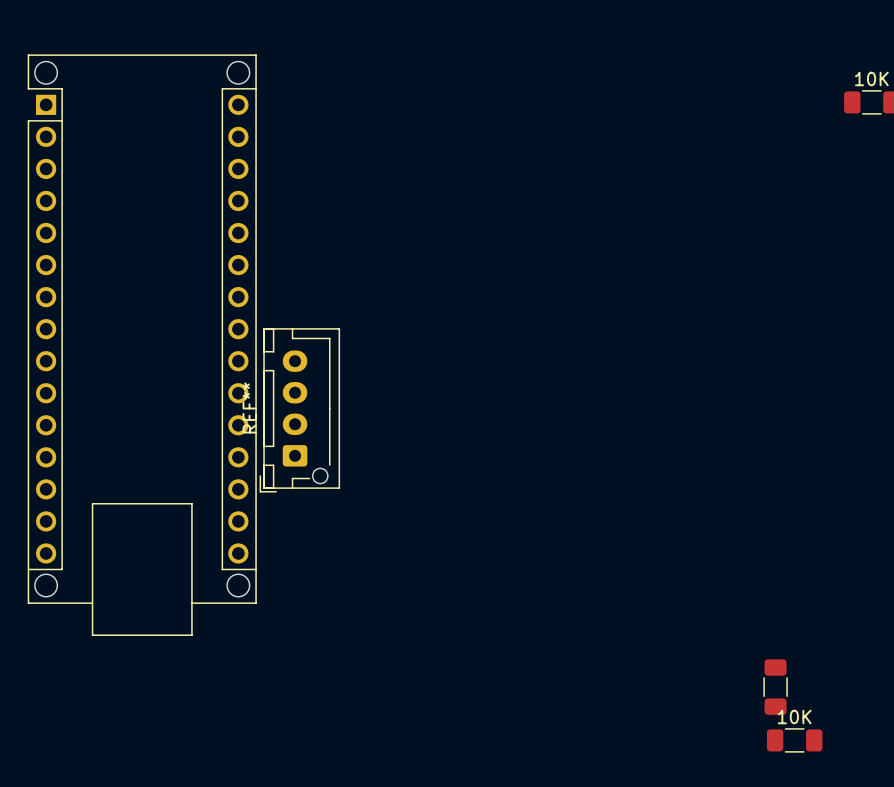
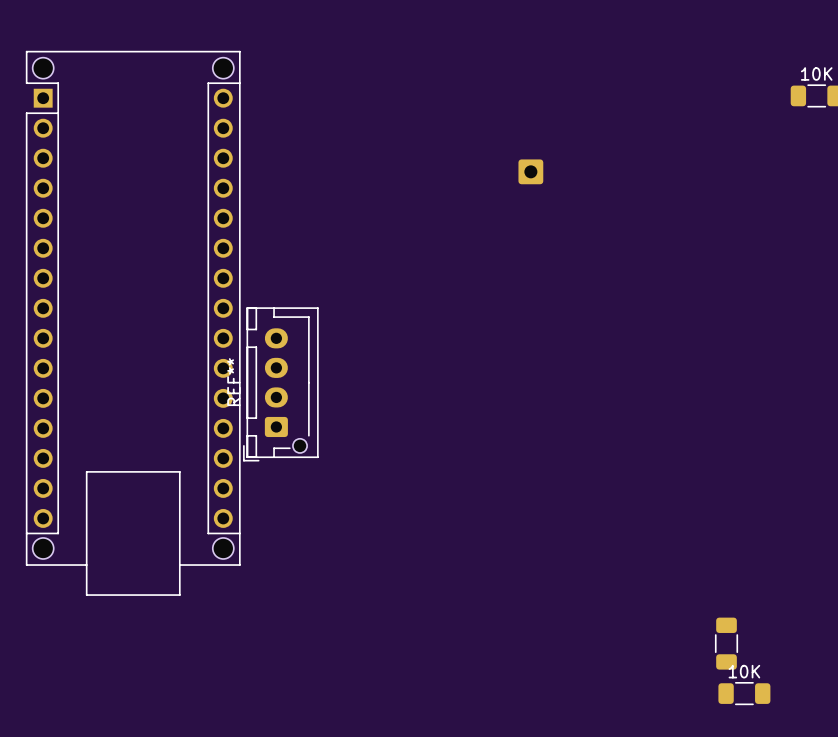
part: none -> (530, 171)

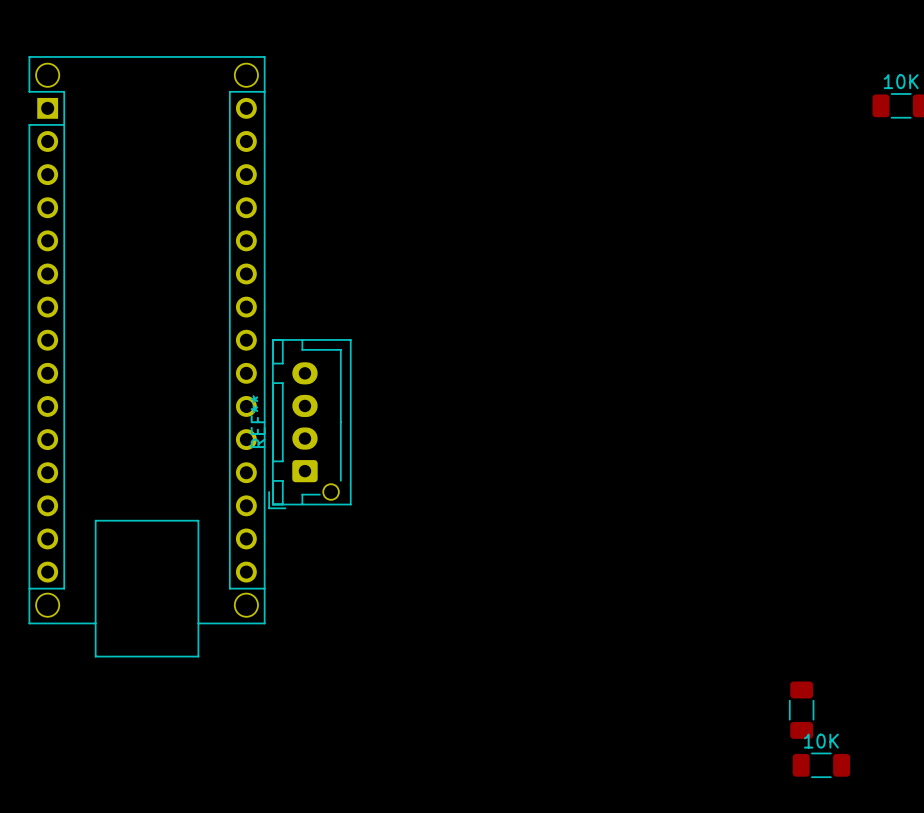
part: (530, 171) -> none

